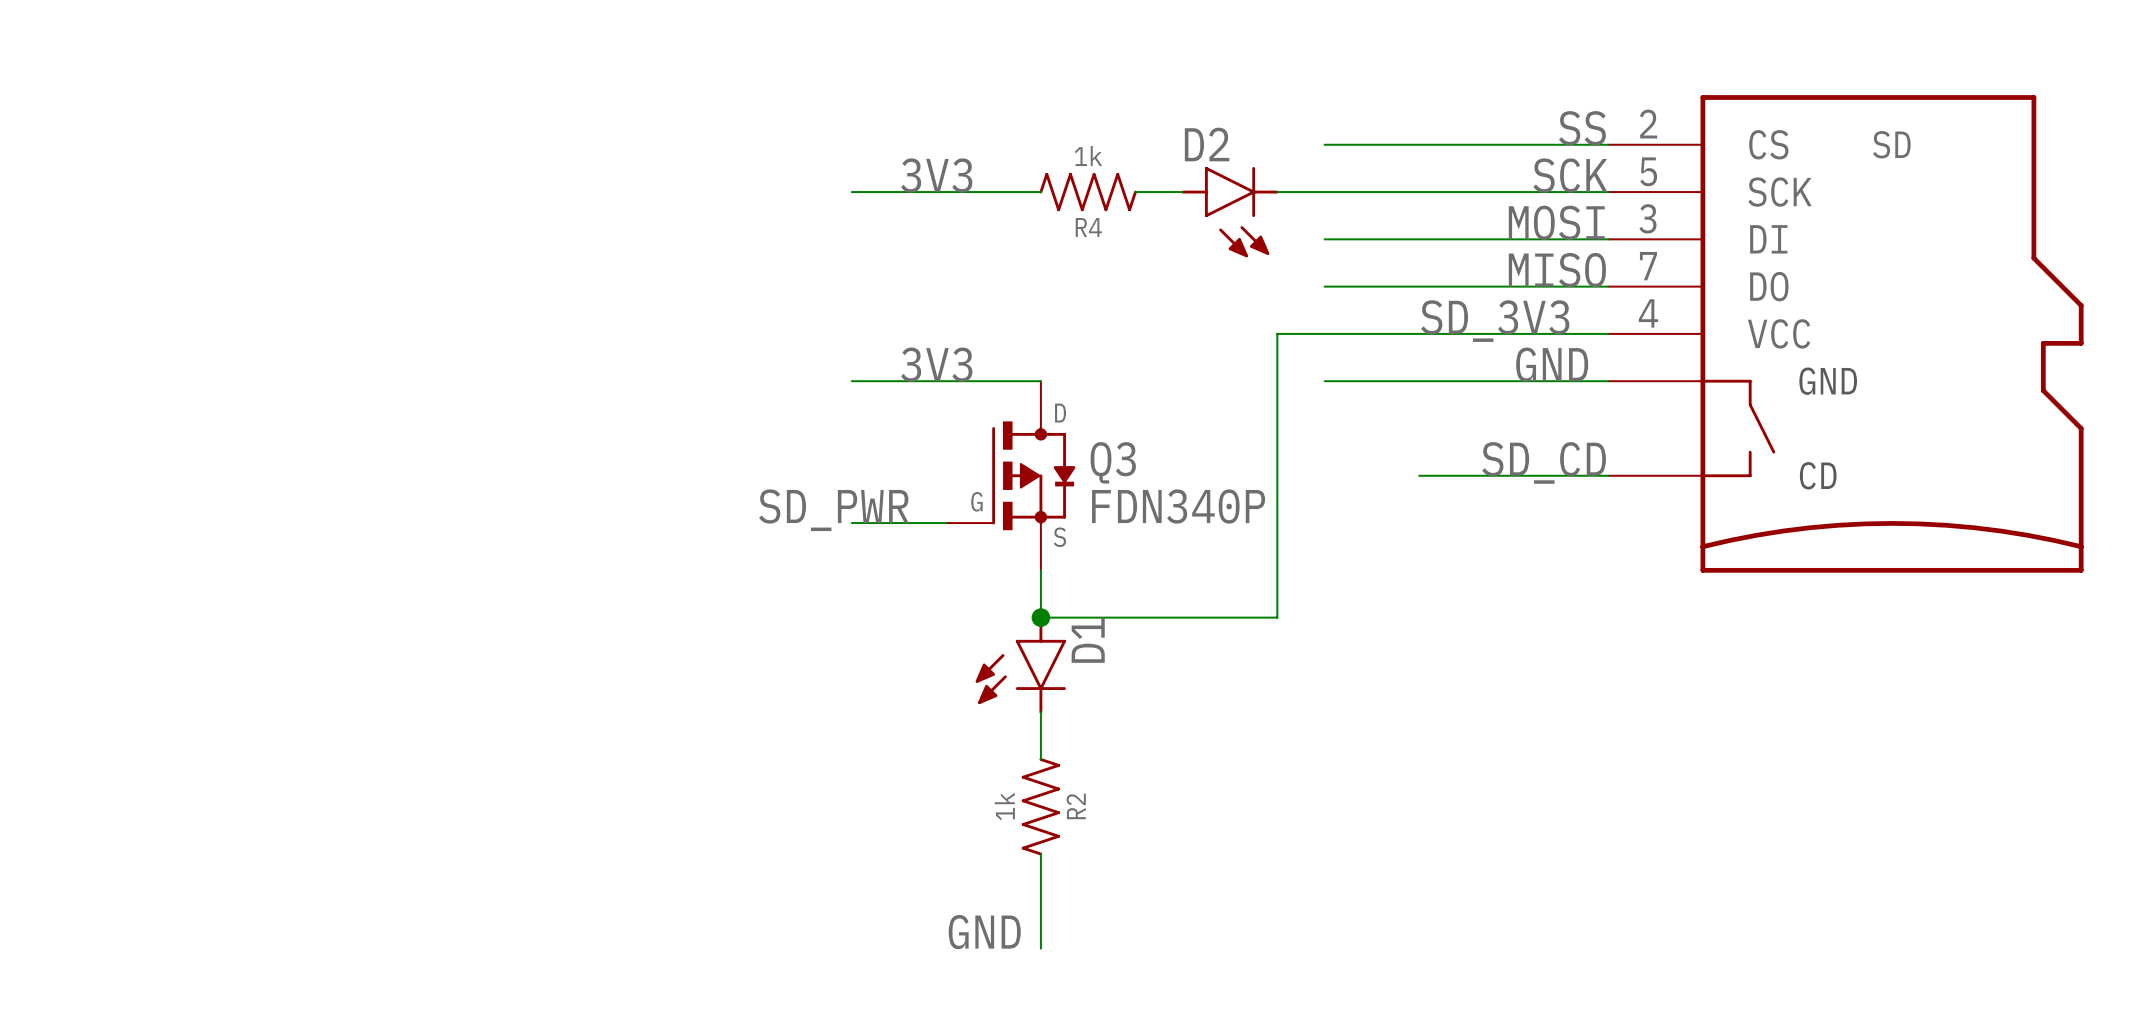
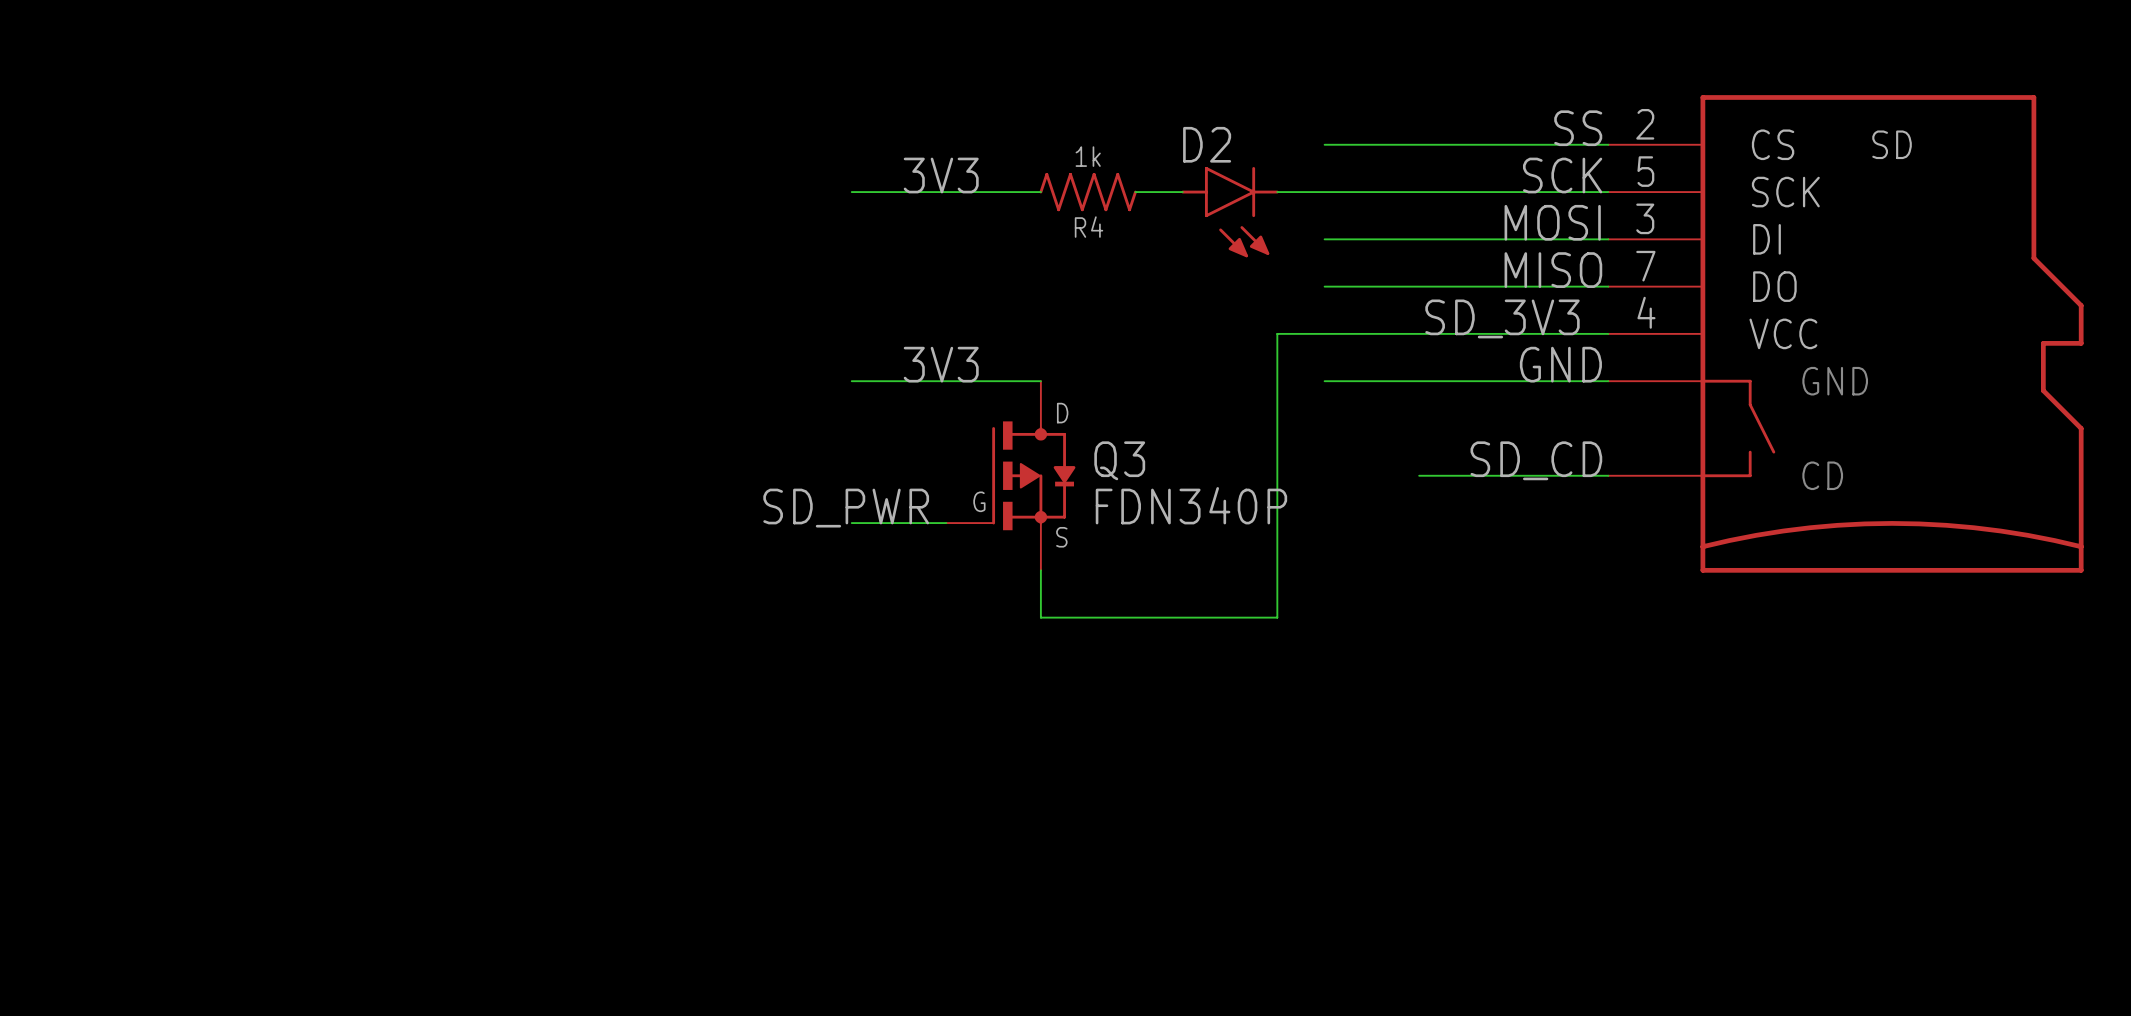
junction: (1040, 617) -> none
D1: (1020, 664) -> none
wire: (1040, 712) (1040, 759) -> none
R2: 1k (1040, 806) -> none
wire: (1040, 854) (1040, 948) -> none
label: GND (984, 932) -> none

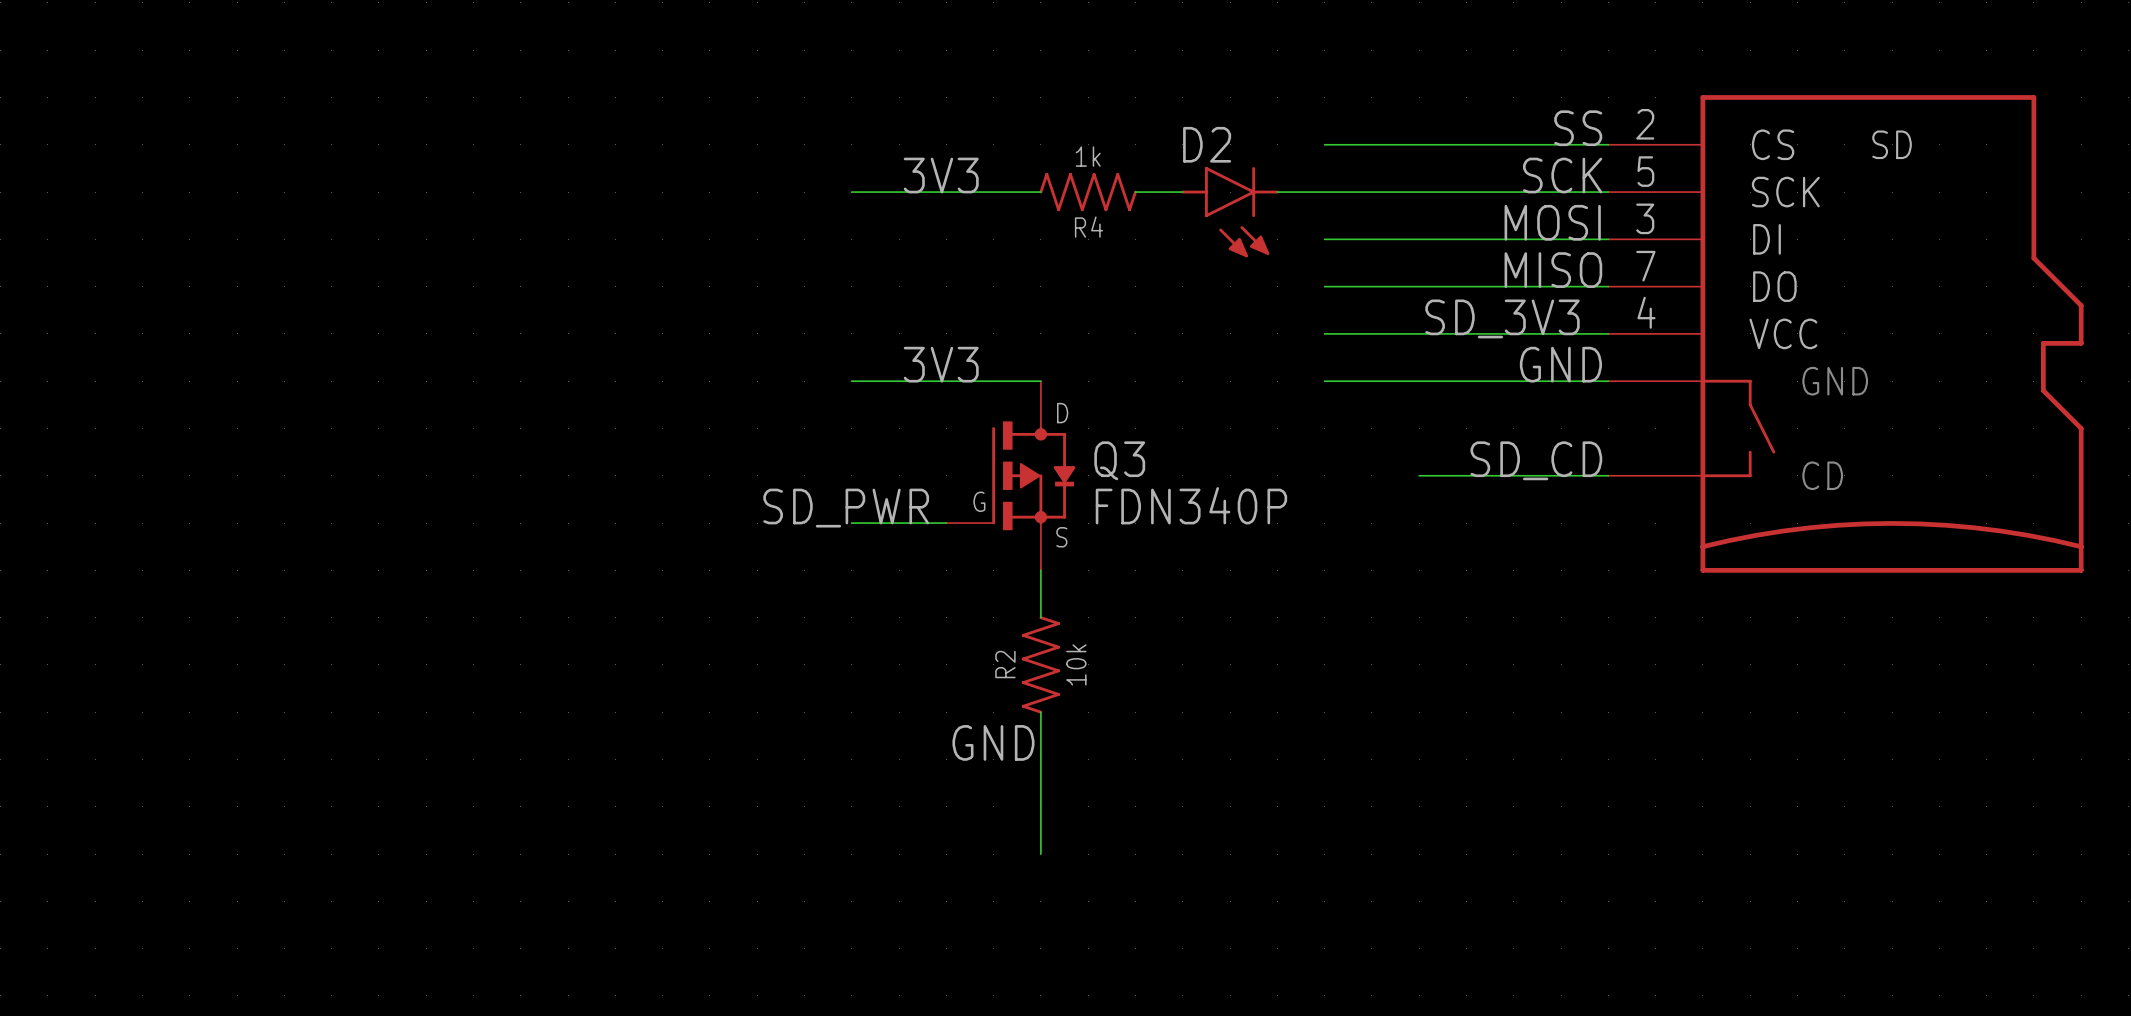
wire: (1324, 333) (1277, 333) (1277, 617) (1040, 617) -> none
R2: none -> 10k (1040, 664)
wire: none -> (1040, 712) (1040, 854)
label: none -> GND (993, 742)

